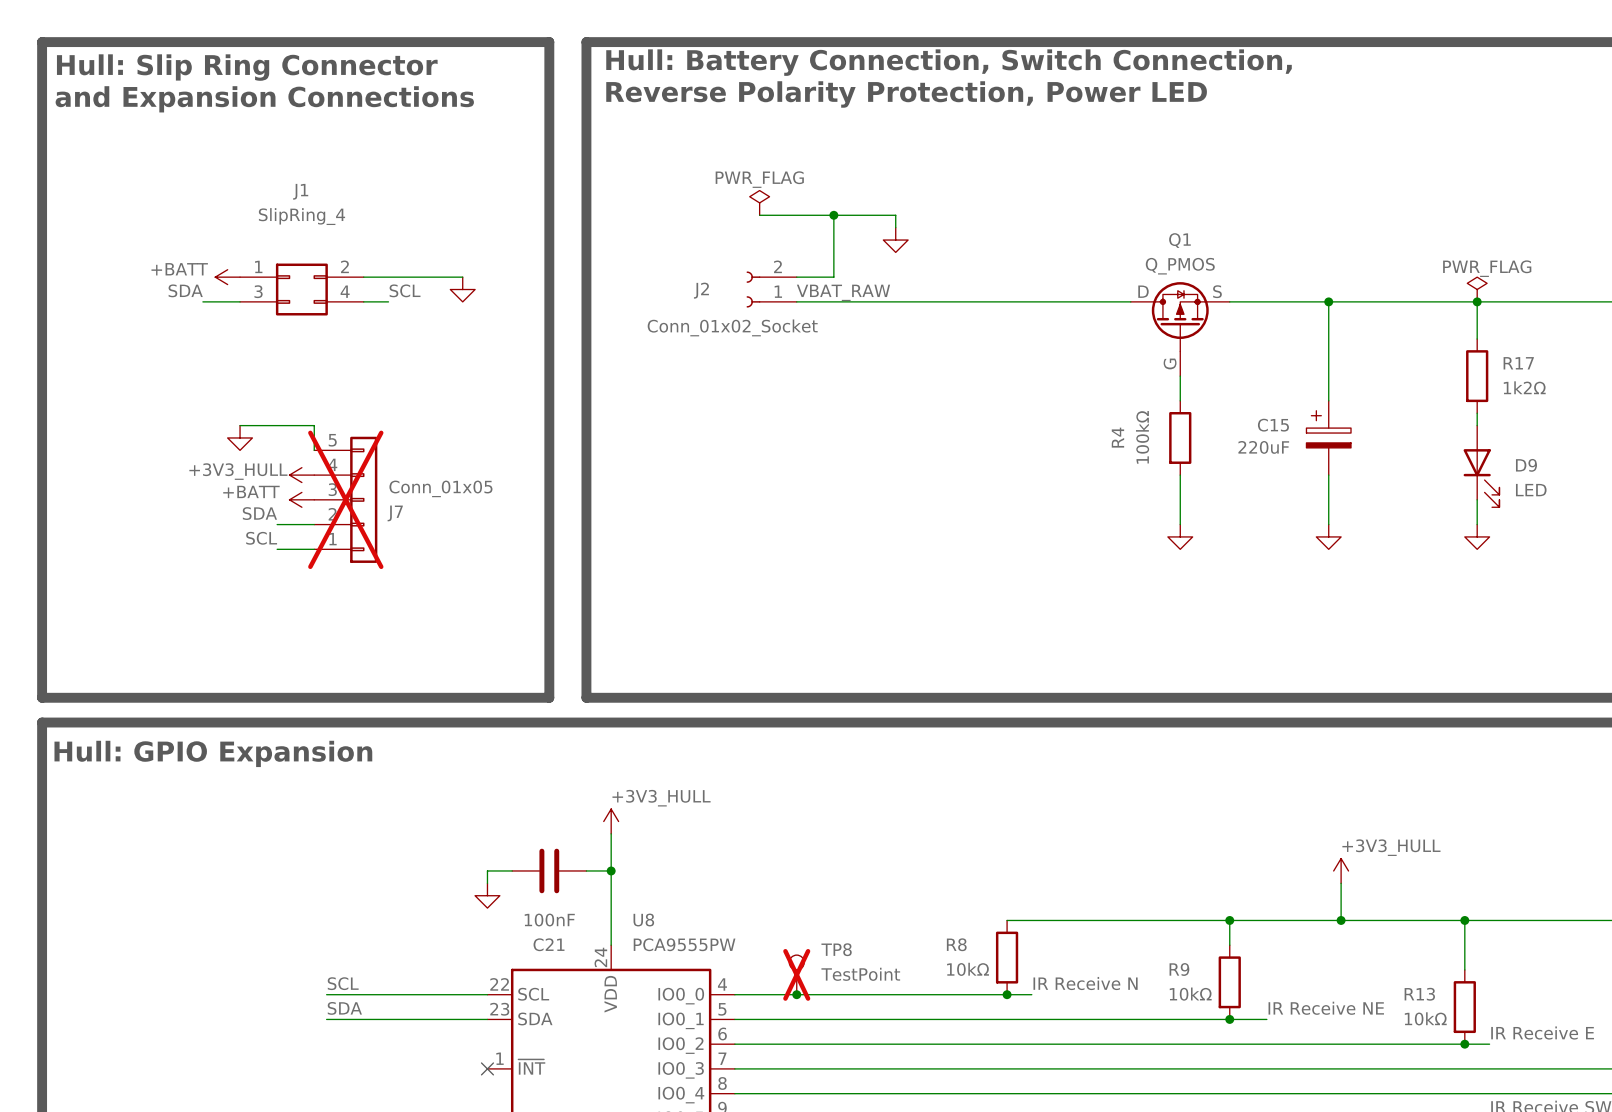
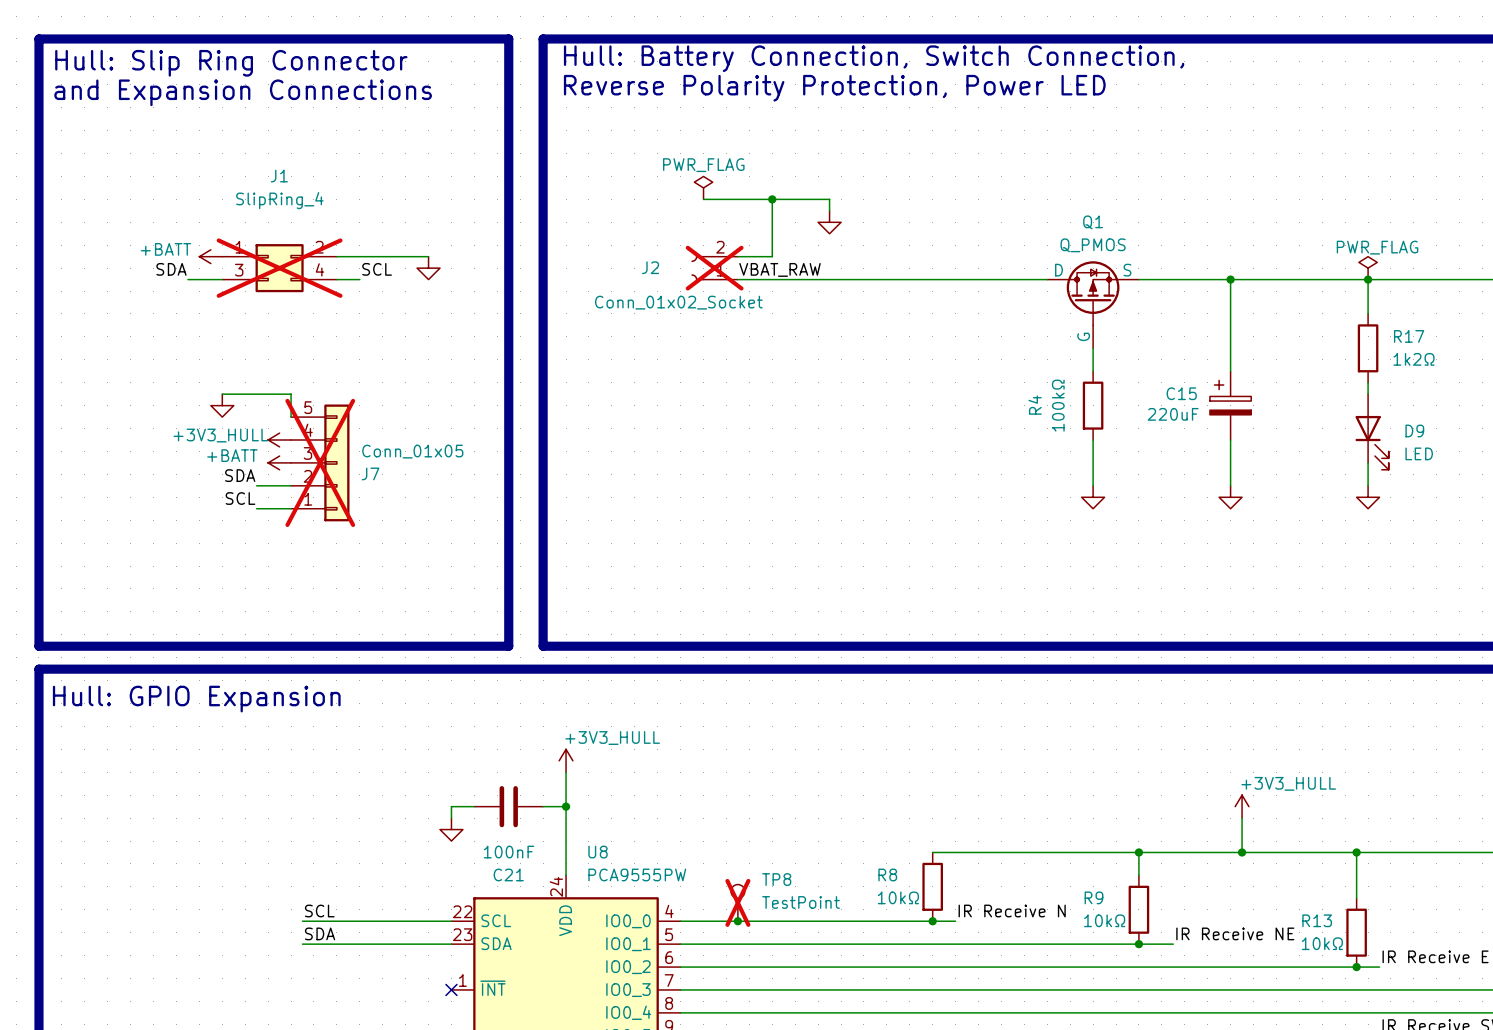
J1 do-not-place cross: none -> (279, 268)
J2 do-not-place cross: none -> (714, 268)

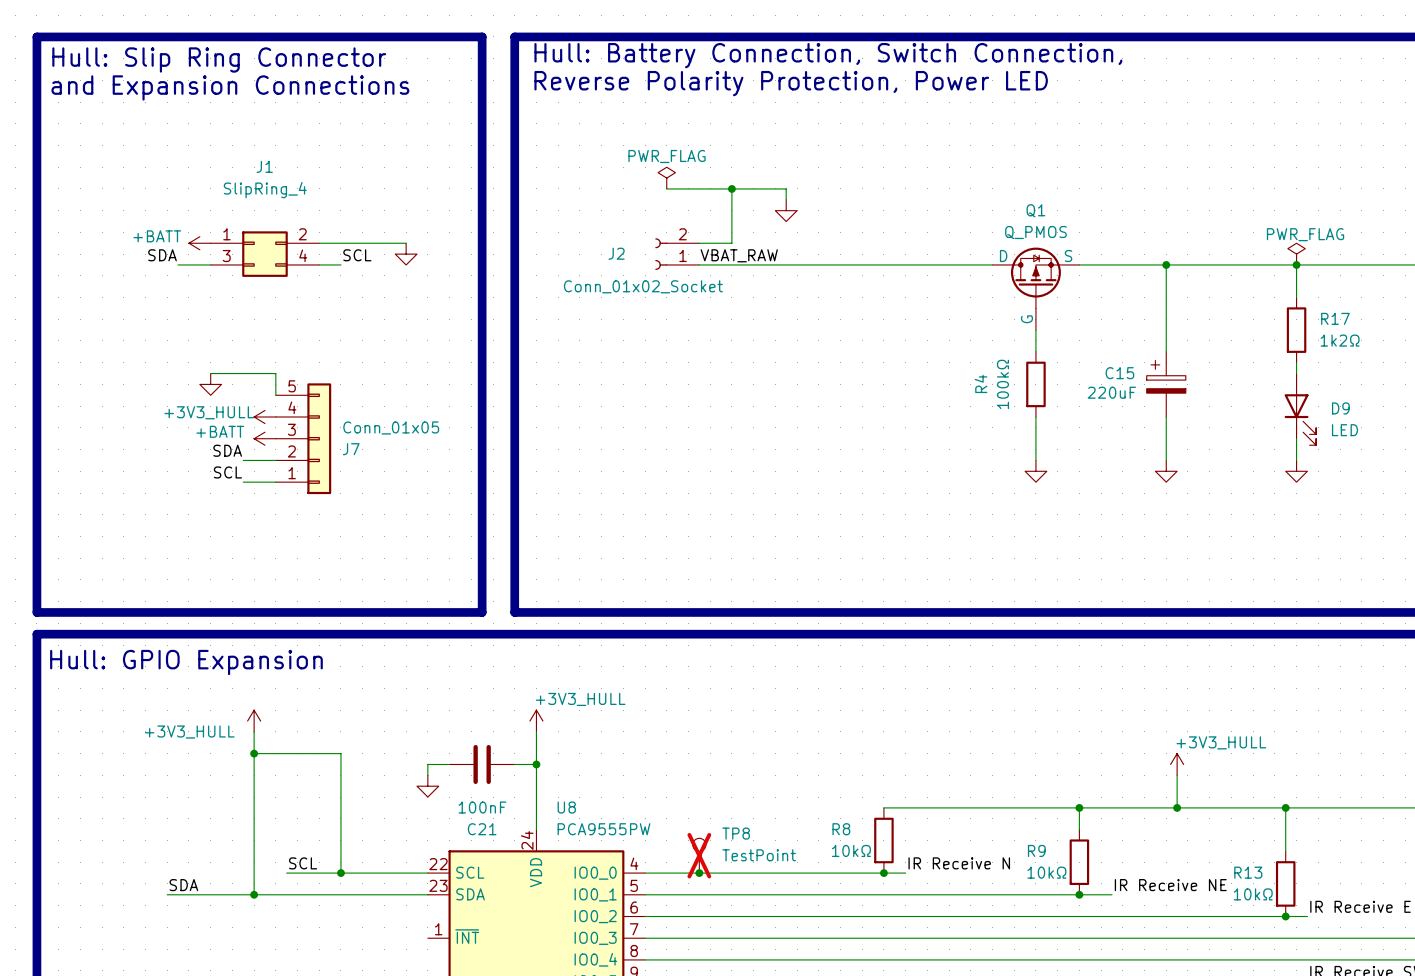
J1 do-not-place cross: (279, 268) -> none
J2 do-not-place cross: (714, 268) -> none
J7 do-not-place cross: (320, 462) -> none
power symbol: none -> +3V3_HULL (254, 721)
wire: none -> (254, 731) (254, 894)
wire: none -> (254, 753) (340, 753) (340, 873)
junction: none -> (254, 753)
junction: none -> (340, 873)
label position: SDA (320, 933) -> SDA (183, 885)
wire: none -> (167, 894) (286, 894)
junction: none -> (254, 894)
no-connect mark: (451, 989) -> none

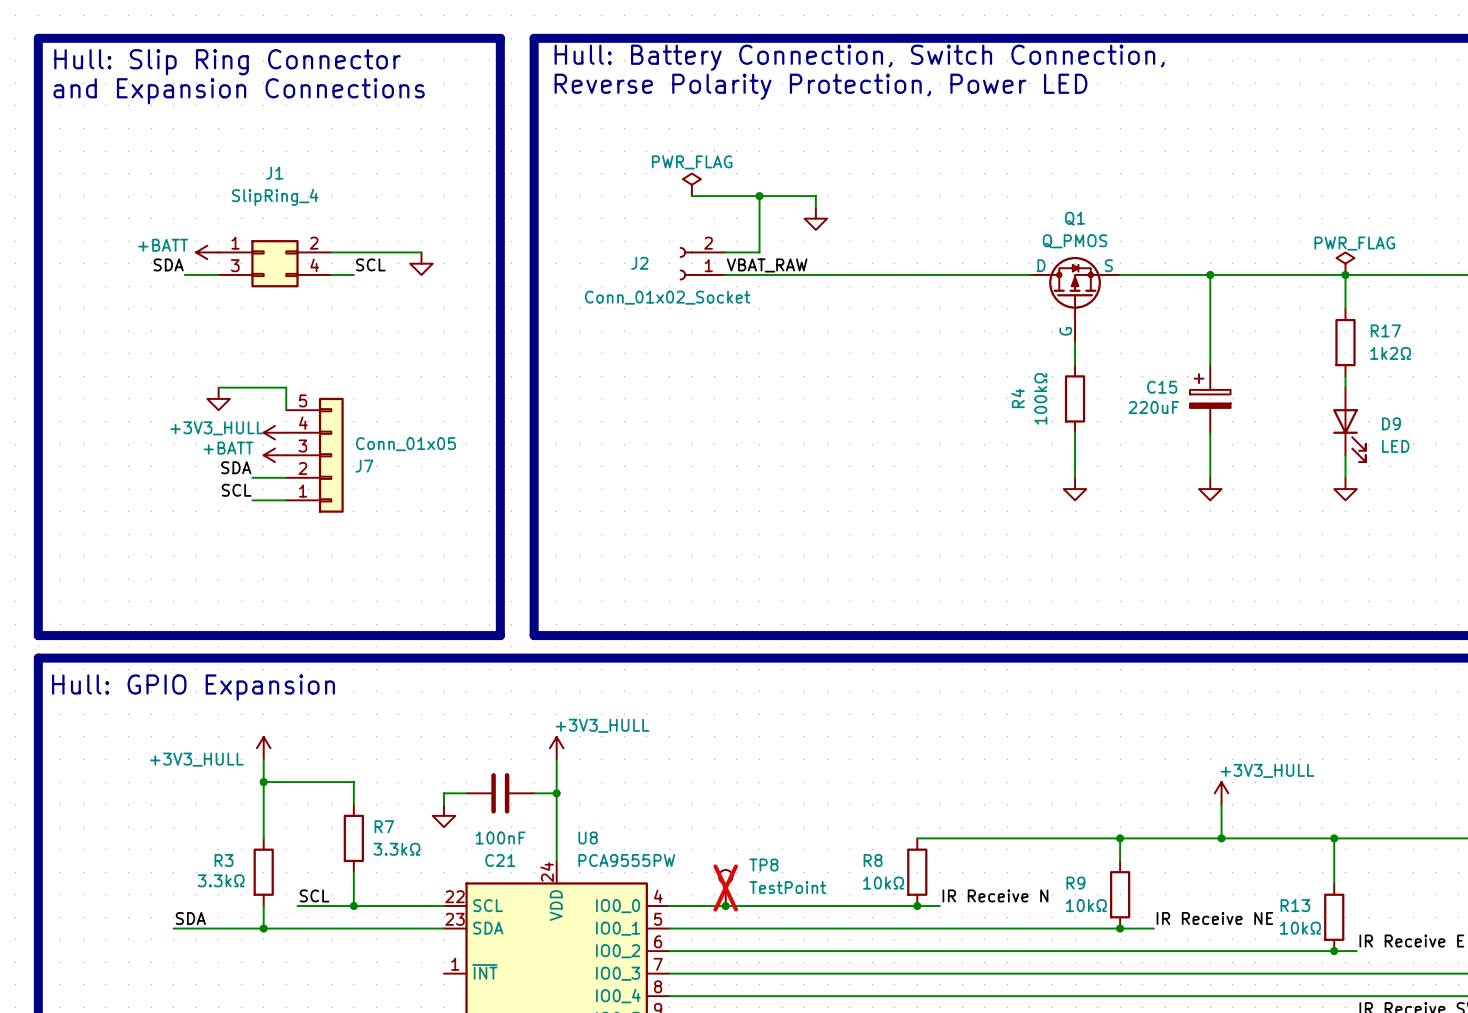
wire: (340, 775) (340, 840) -> none
wire: (254, 807) (254, 873) -> none
R7: none -> 3.3kΩ (353, 838)
R3: none -> 3.3kΩ (263, 872)

